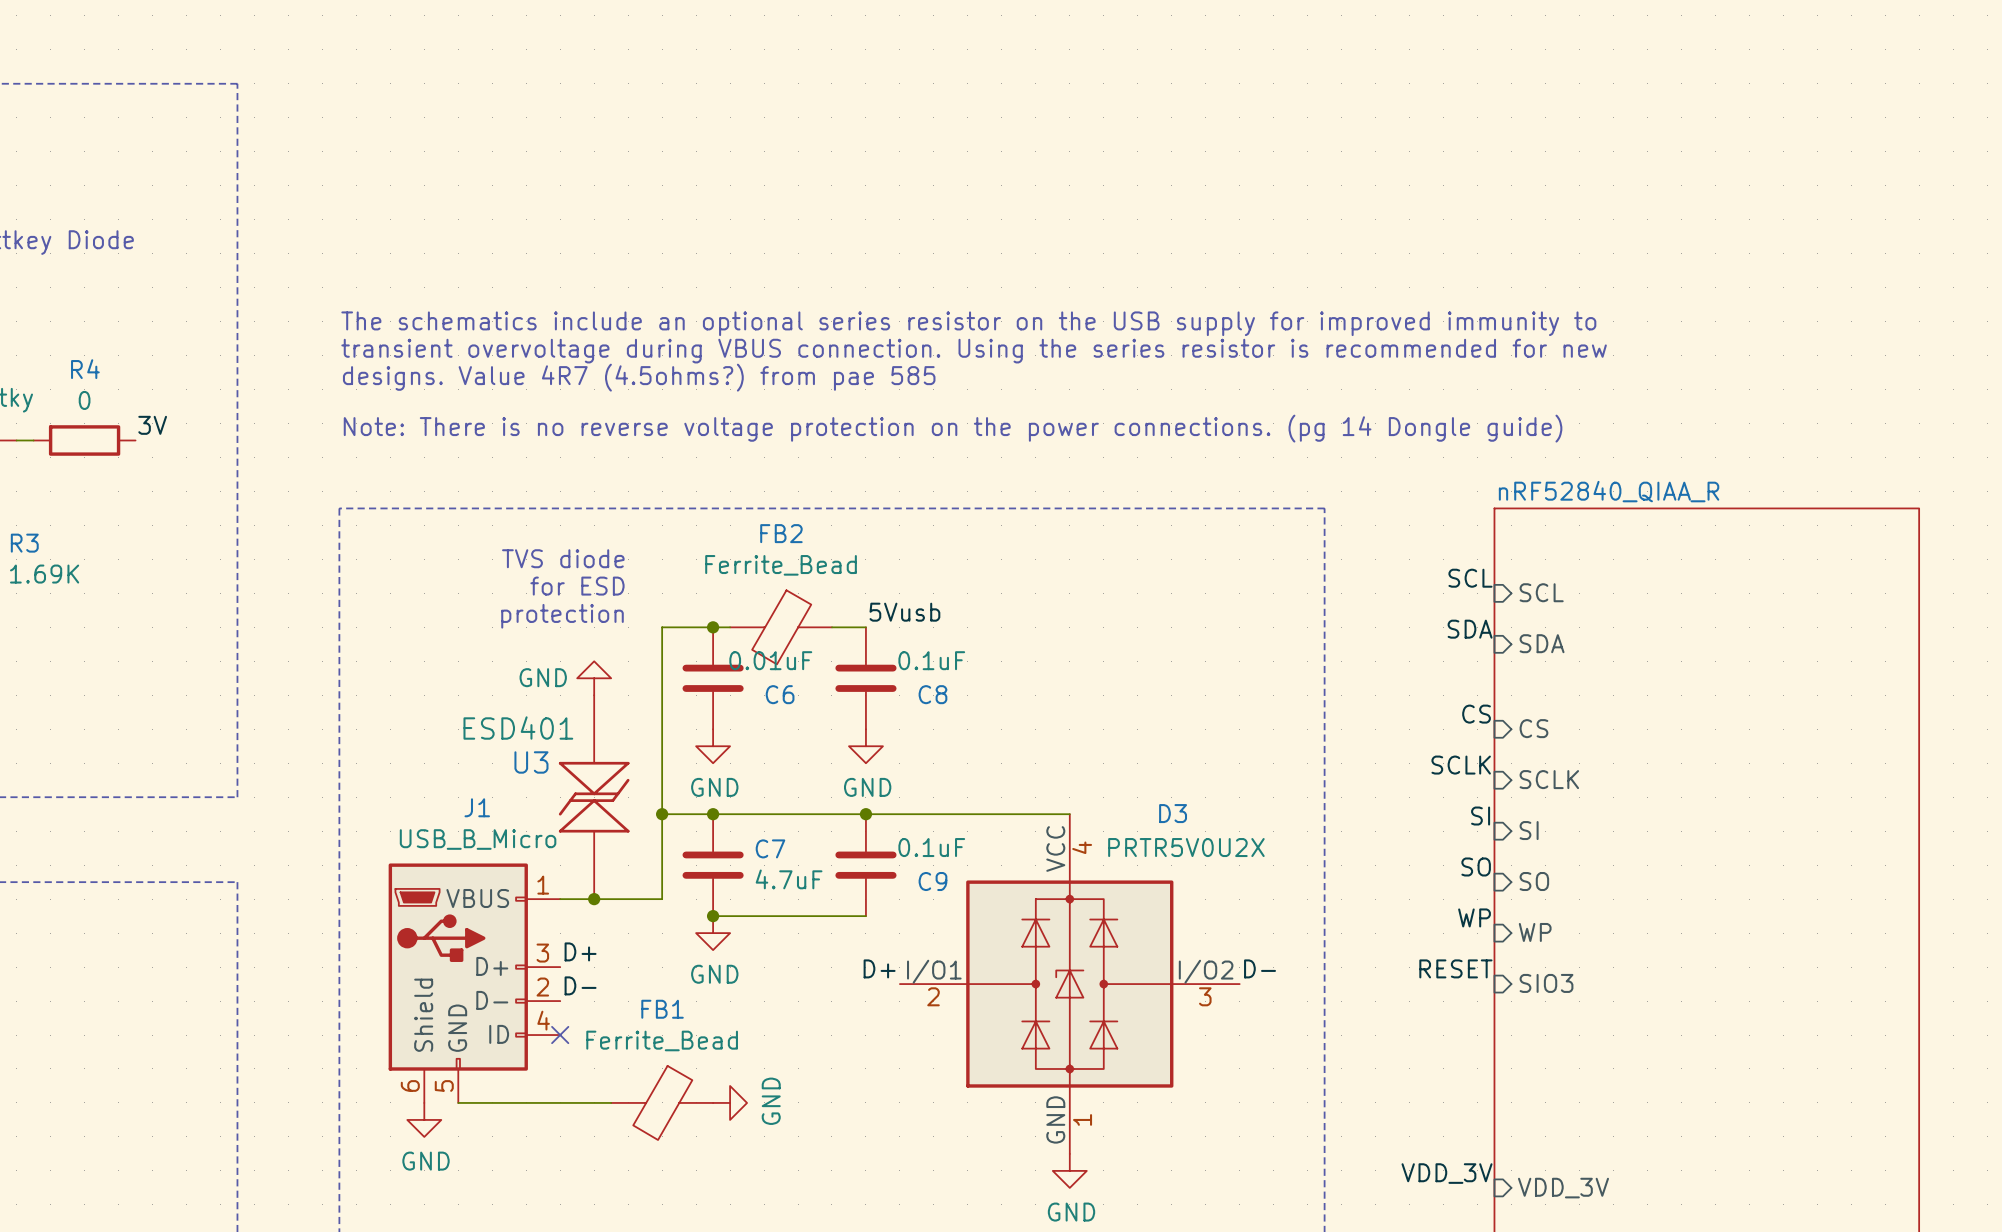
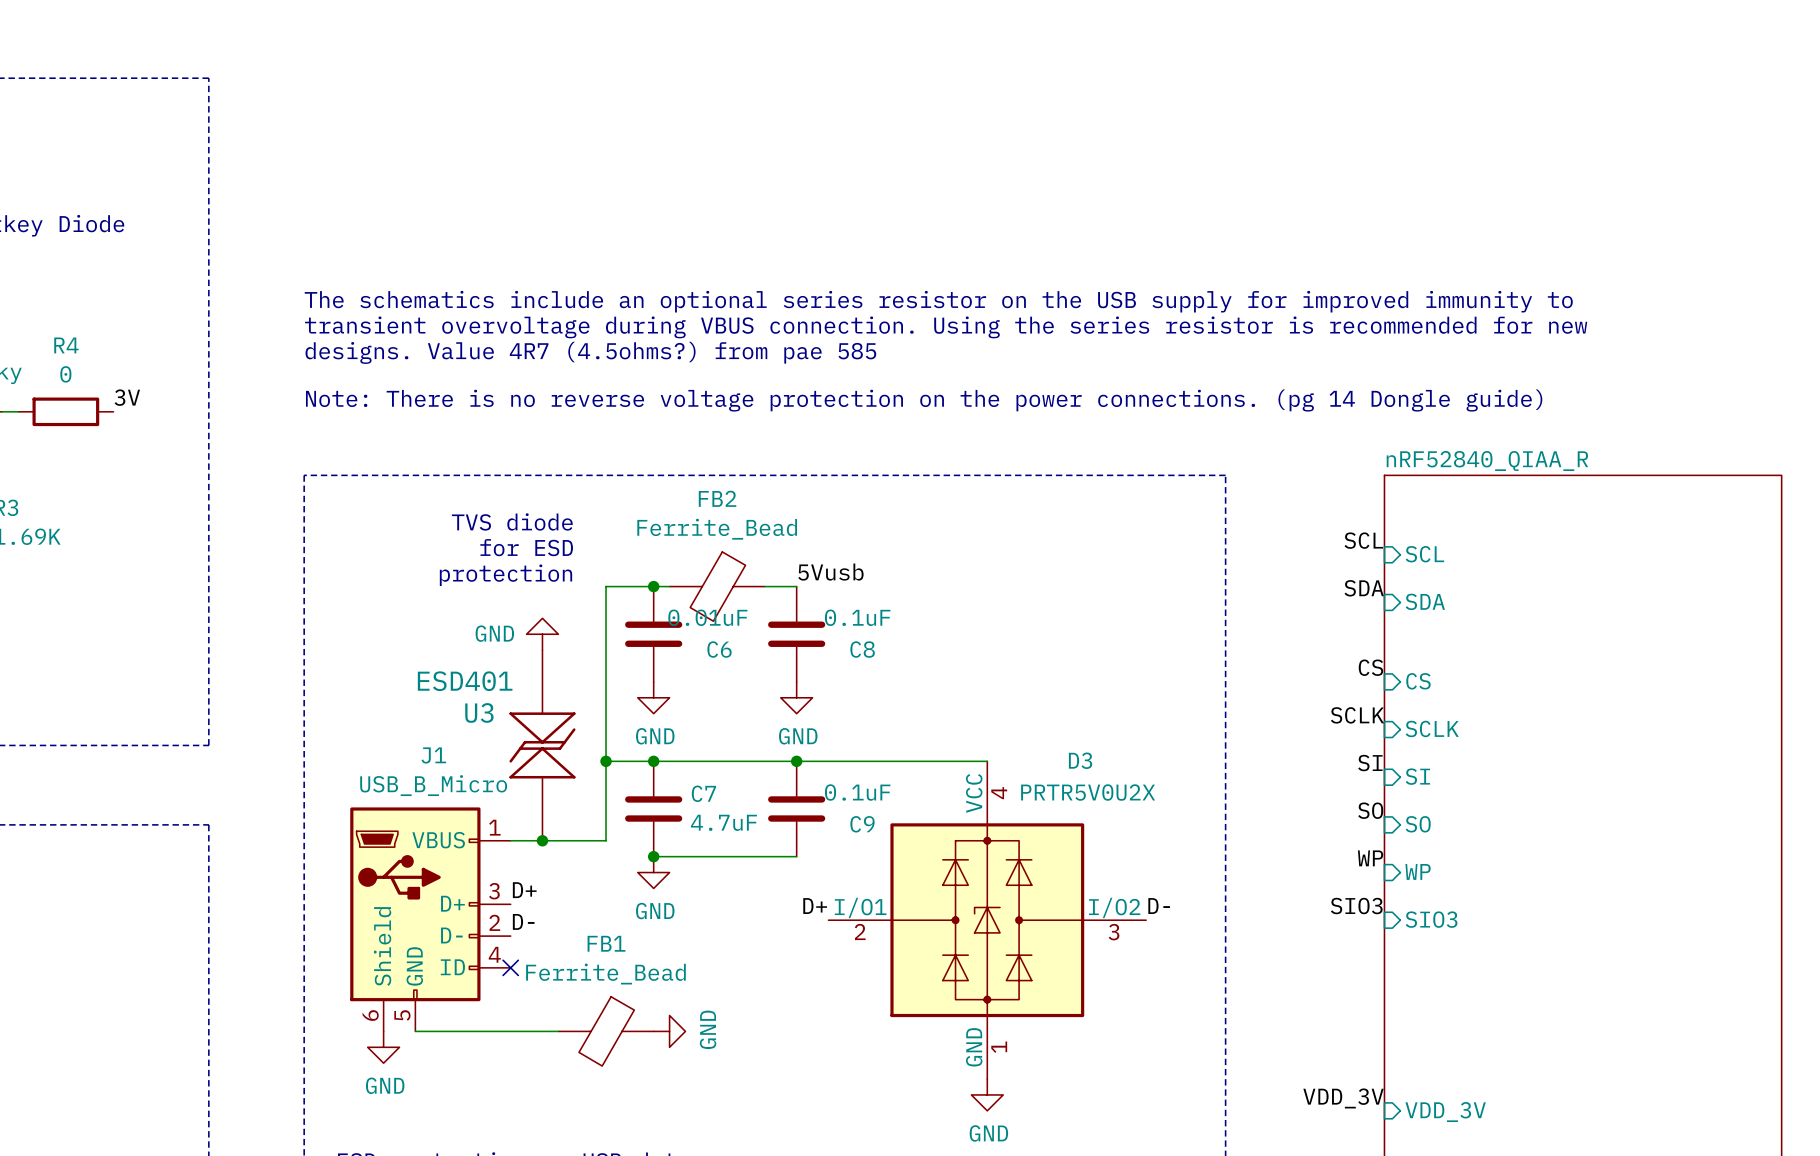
label: RESET (1455, 968) -> SIO3 (1356, 906)

